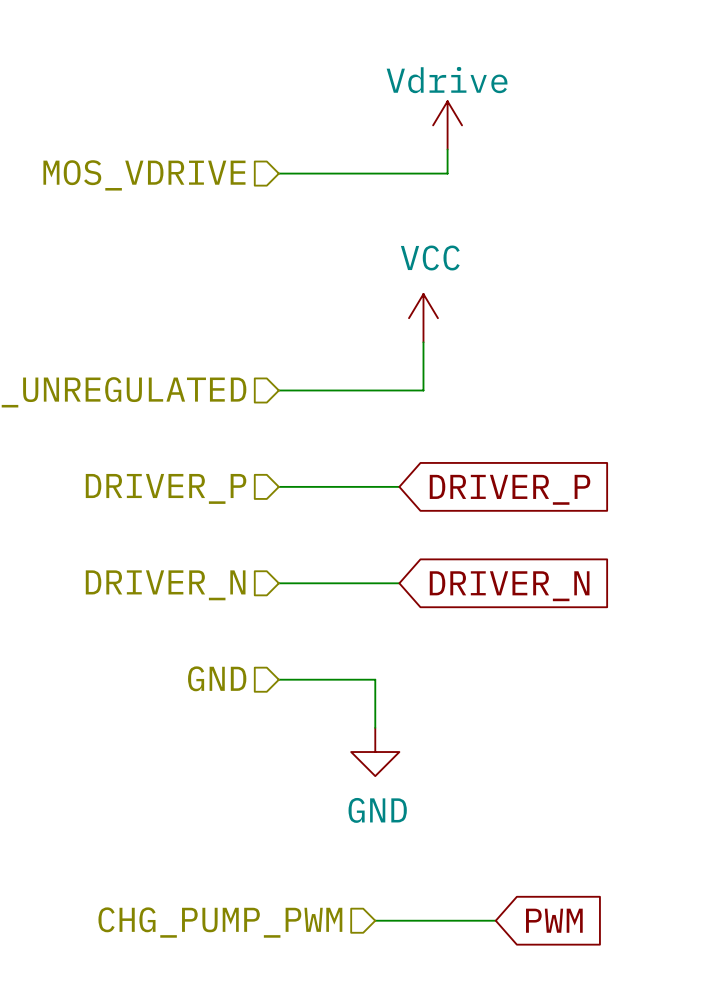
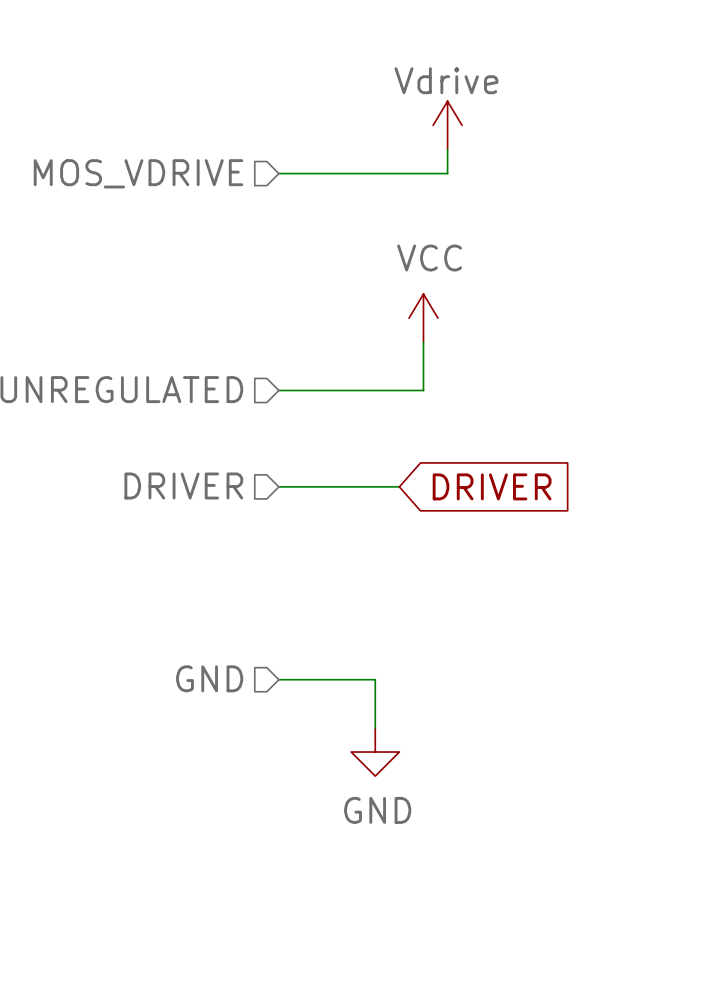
hierarchical label: DRIVER_P (166, 488) -> DRIVER (183, 485)
global label: DRIVER_P (510, 489) -> DRIVER (492, 486)
wire: (278, 583) (399, 583) -> none
hierarchical label: DRIVER_N (165, 585) -> none
global label: DRIVER_N (509, 586) -> none
wire: (375, 920) (495, 920) -> none
global label: PWM (554, 920) -> none
hierarchical label: CHG_PUMP_PWM (220, 922) -> none

